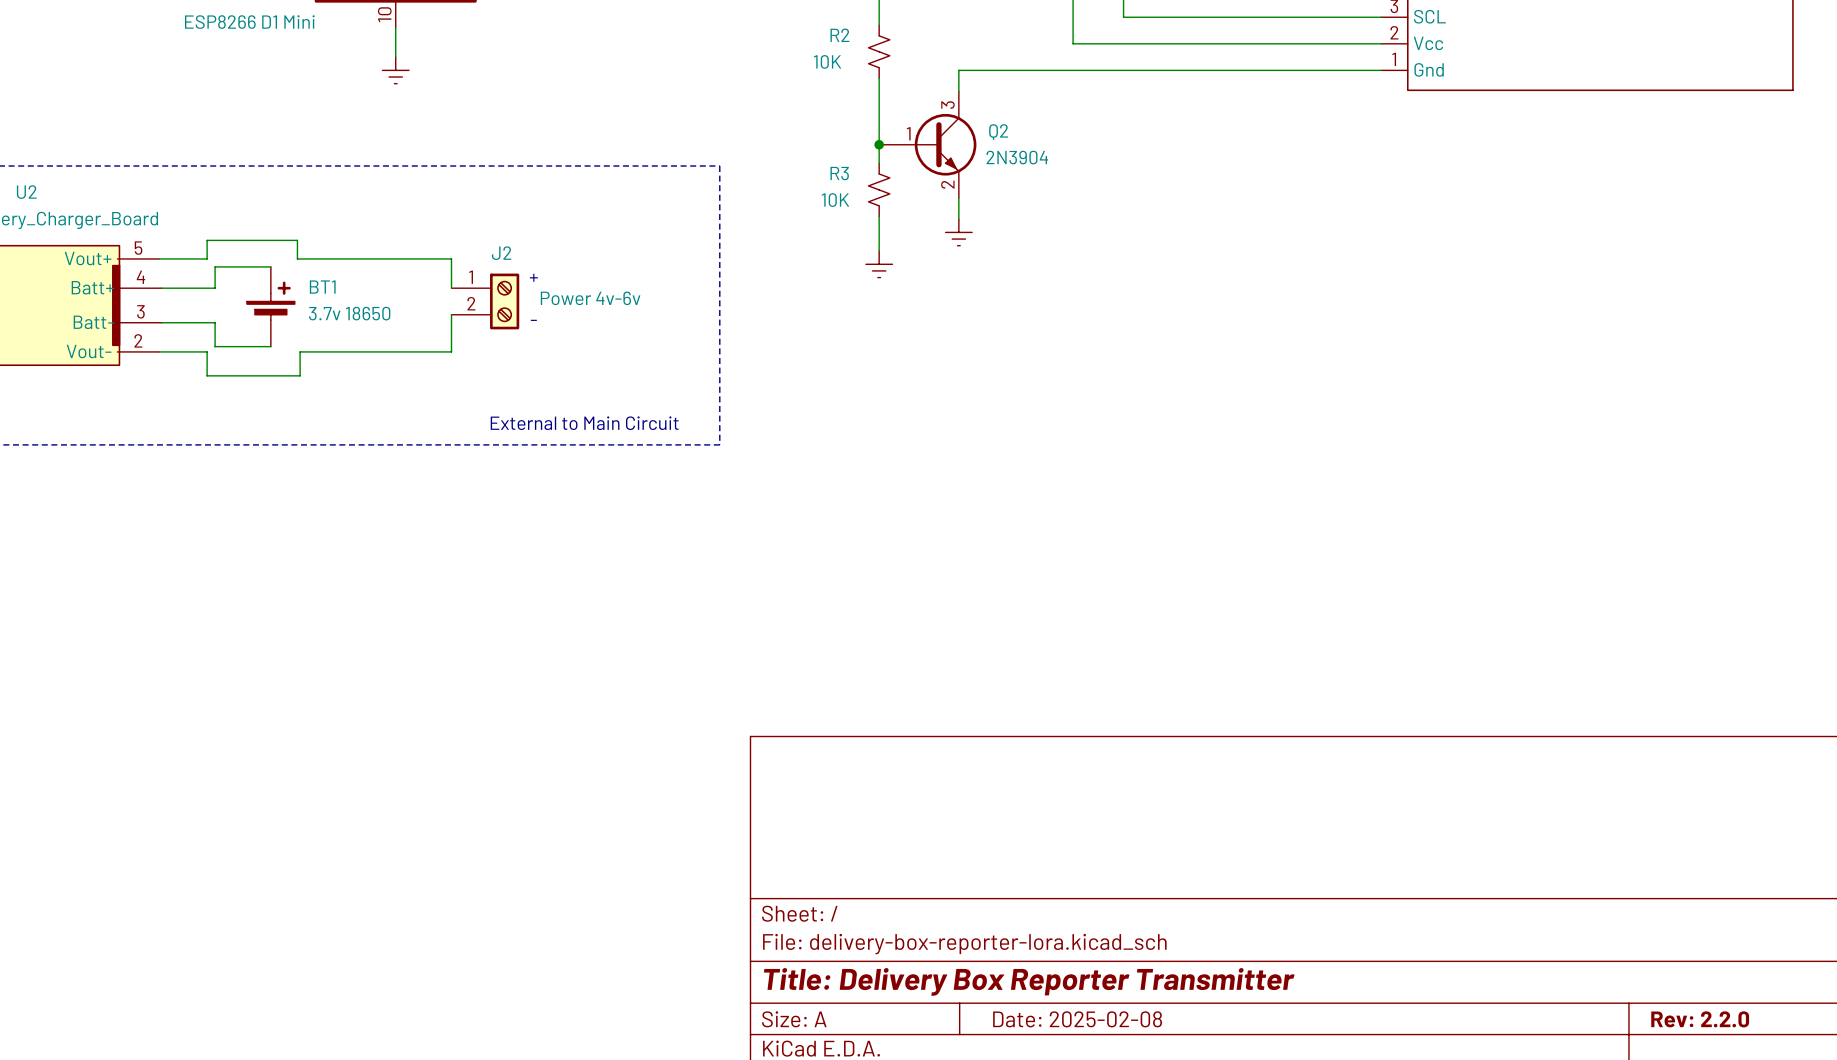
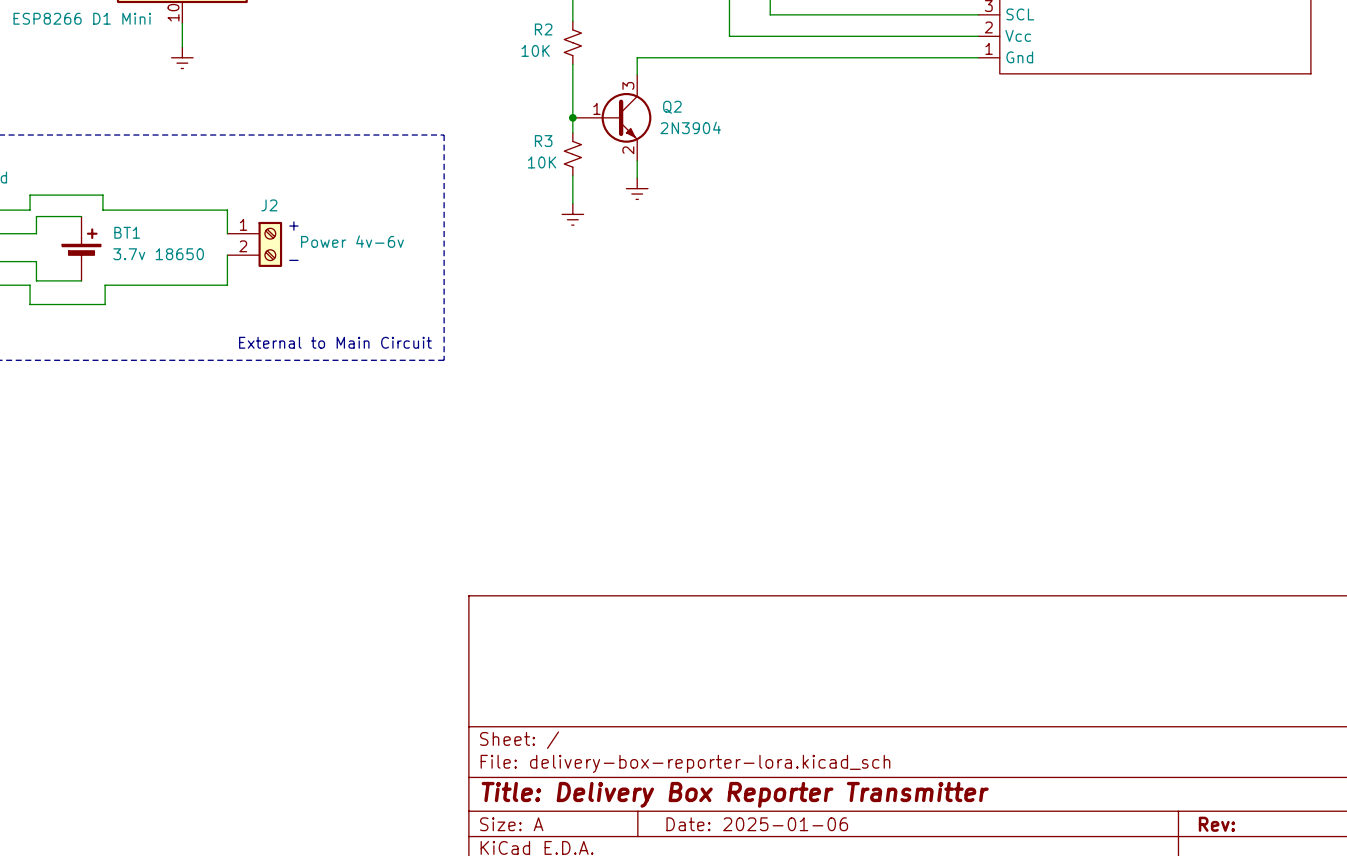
title block: Date: 2025-02-08 (1077, 1019) -> Date: 2025-01-06 (757, 824)
title block: Rev: 2.2.0 (1700, 1019) -> Rev: (1216, 824)

